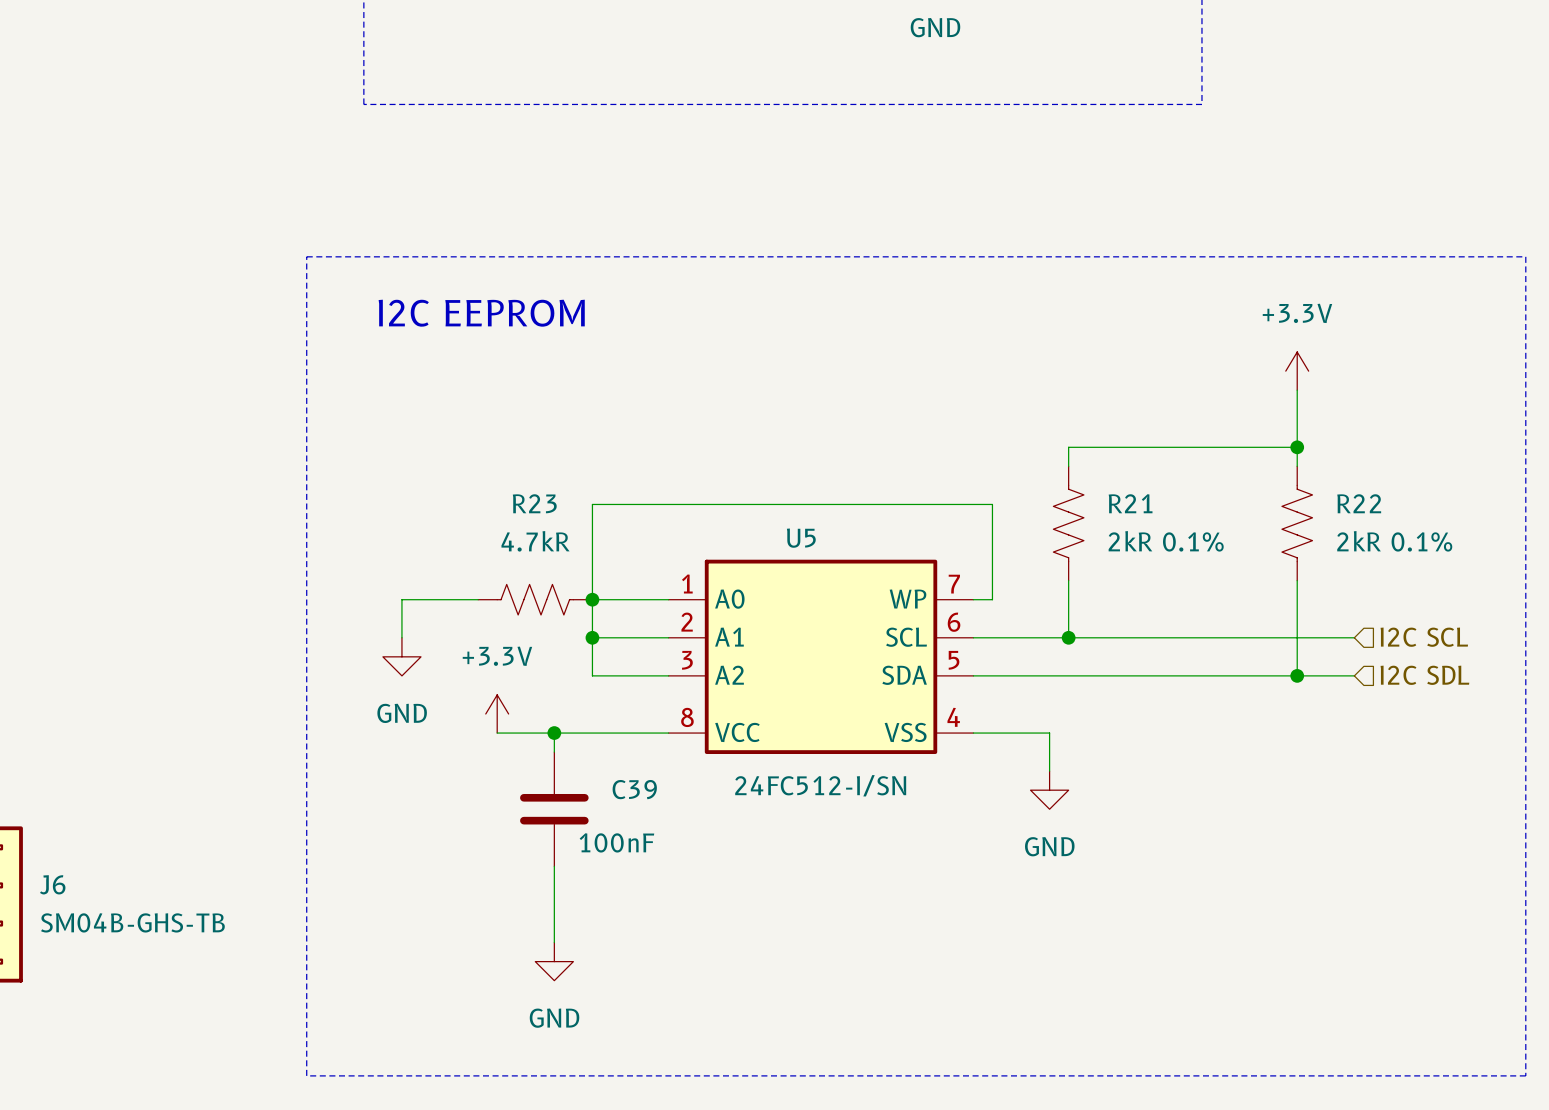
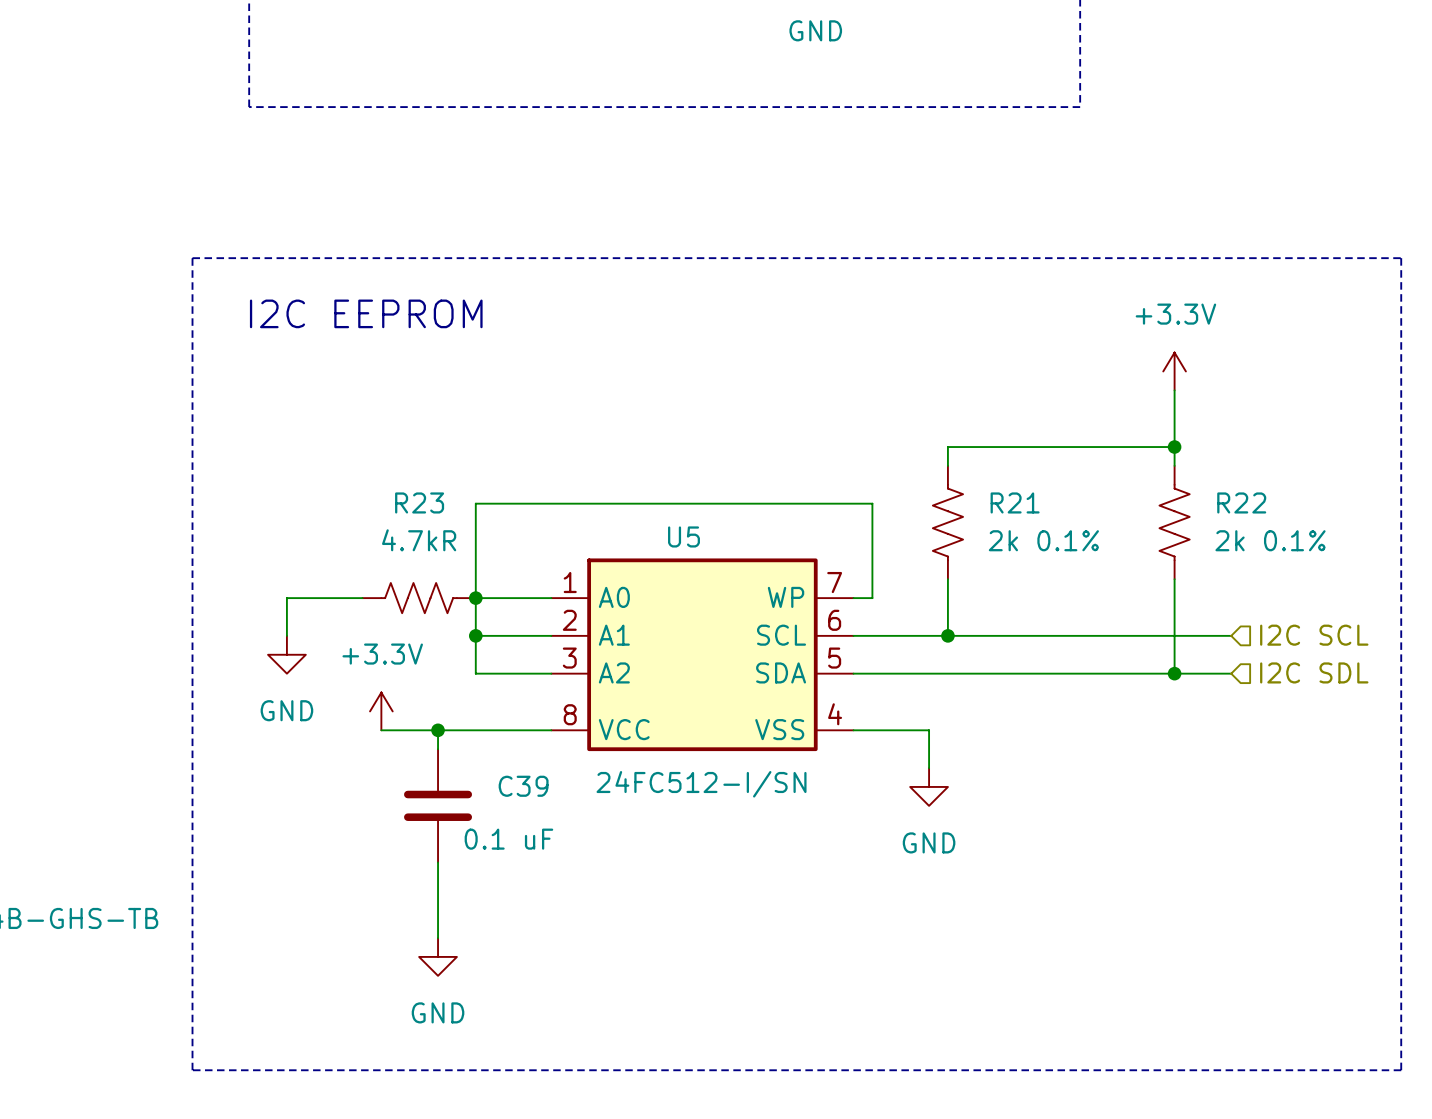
R21 value: 2kR 0.1% (1166, 541) -> 2k 0.1% (1043, 540)
R22 value: 2kR 0.1% (1394, 541) -> 2k 0.1% (1270, 540)
C39 value: 100nF (616, 842) -> 0.1 uF (508, 839)

